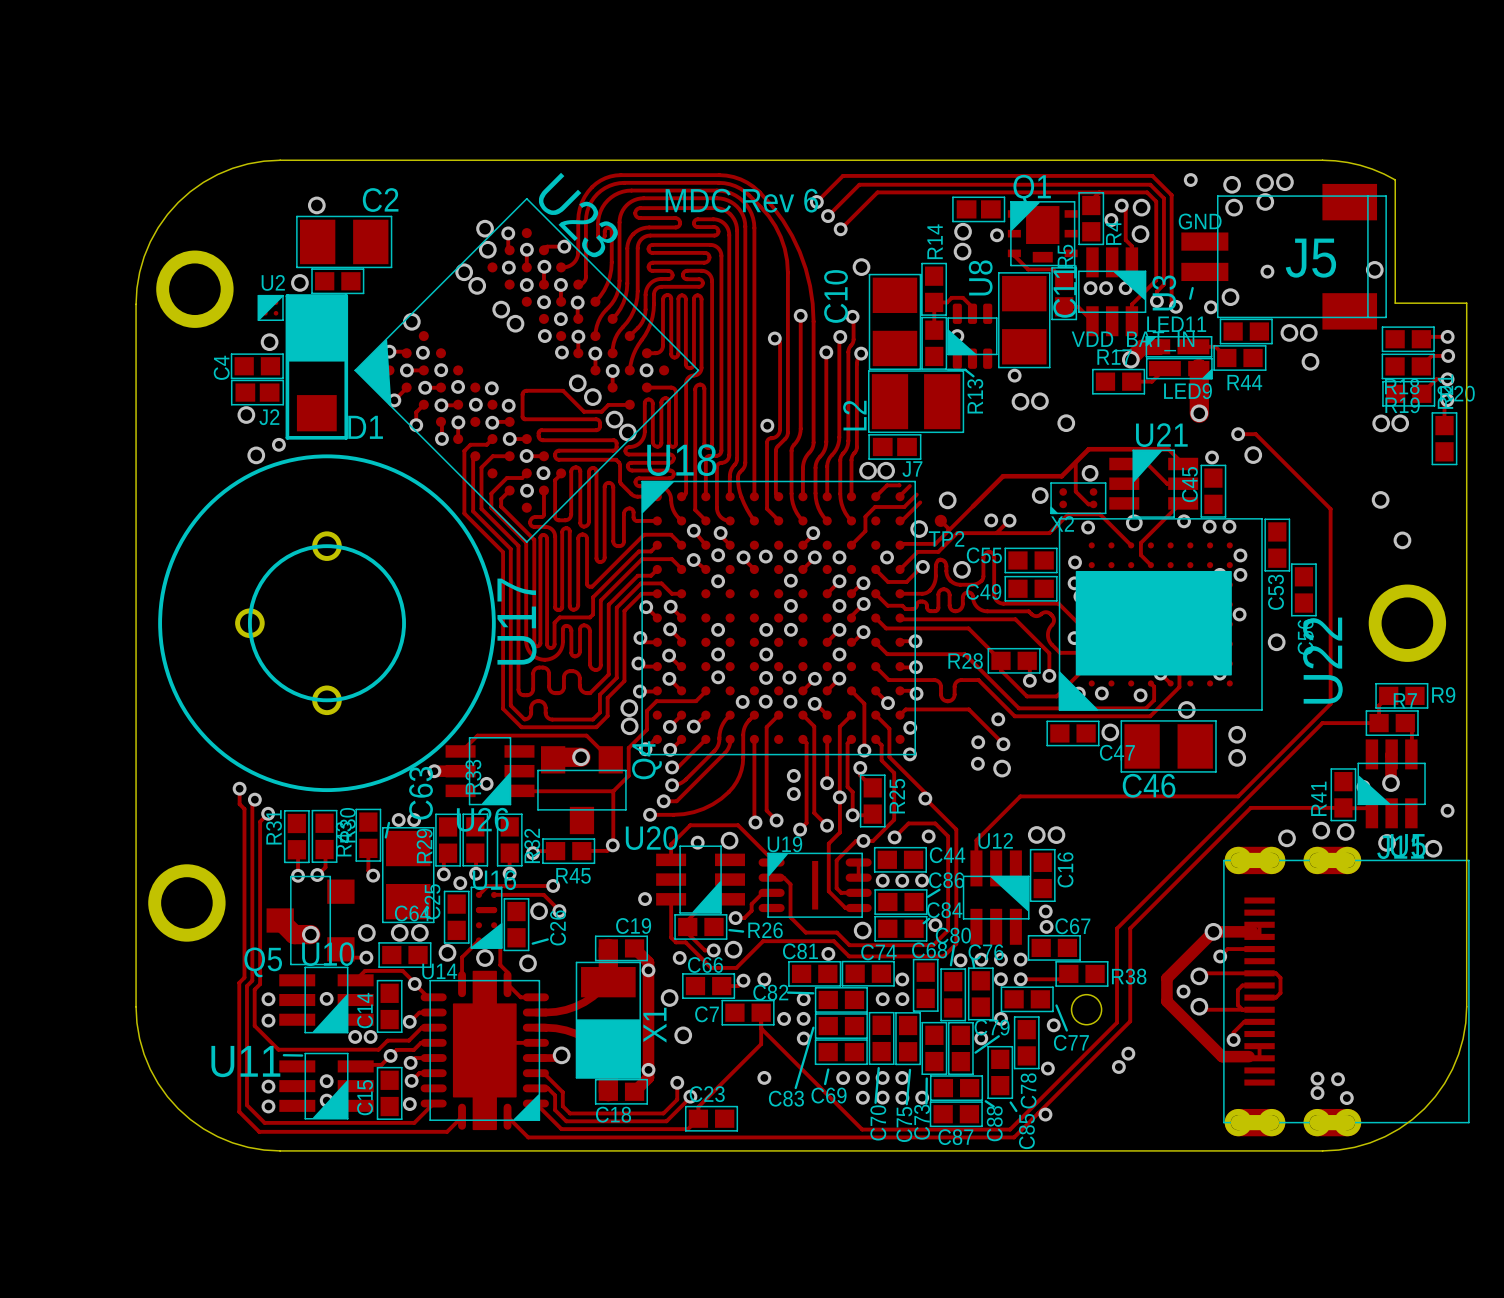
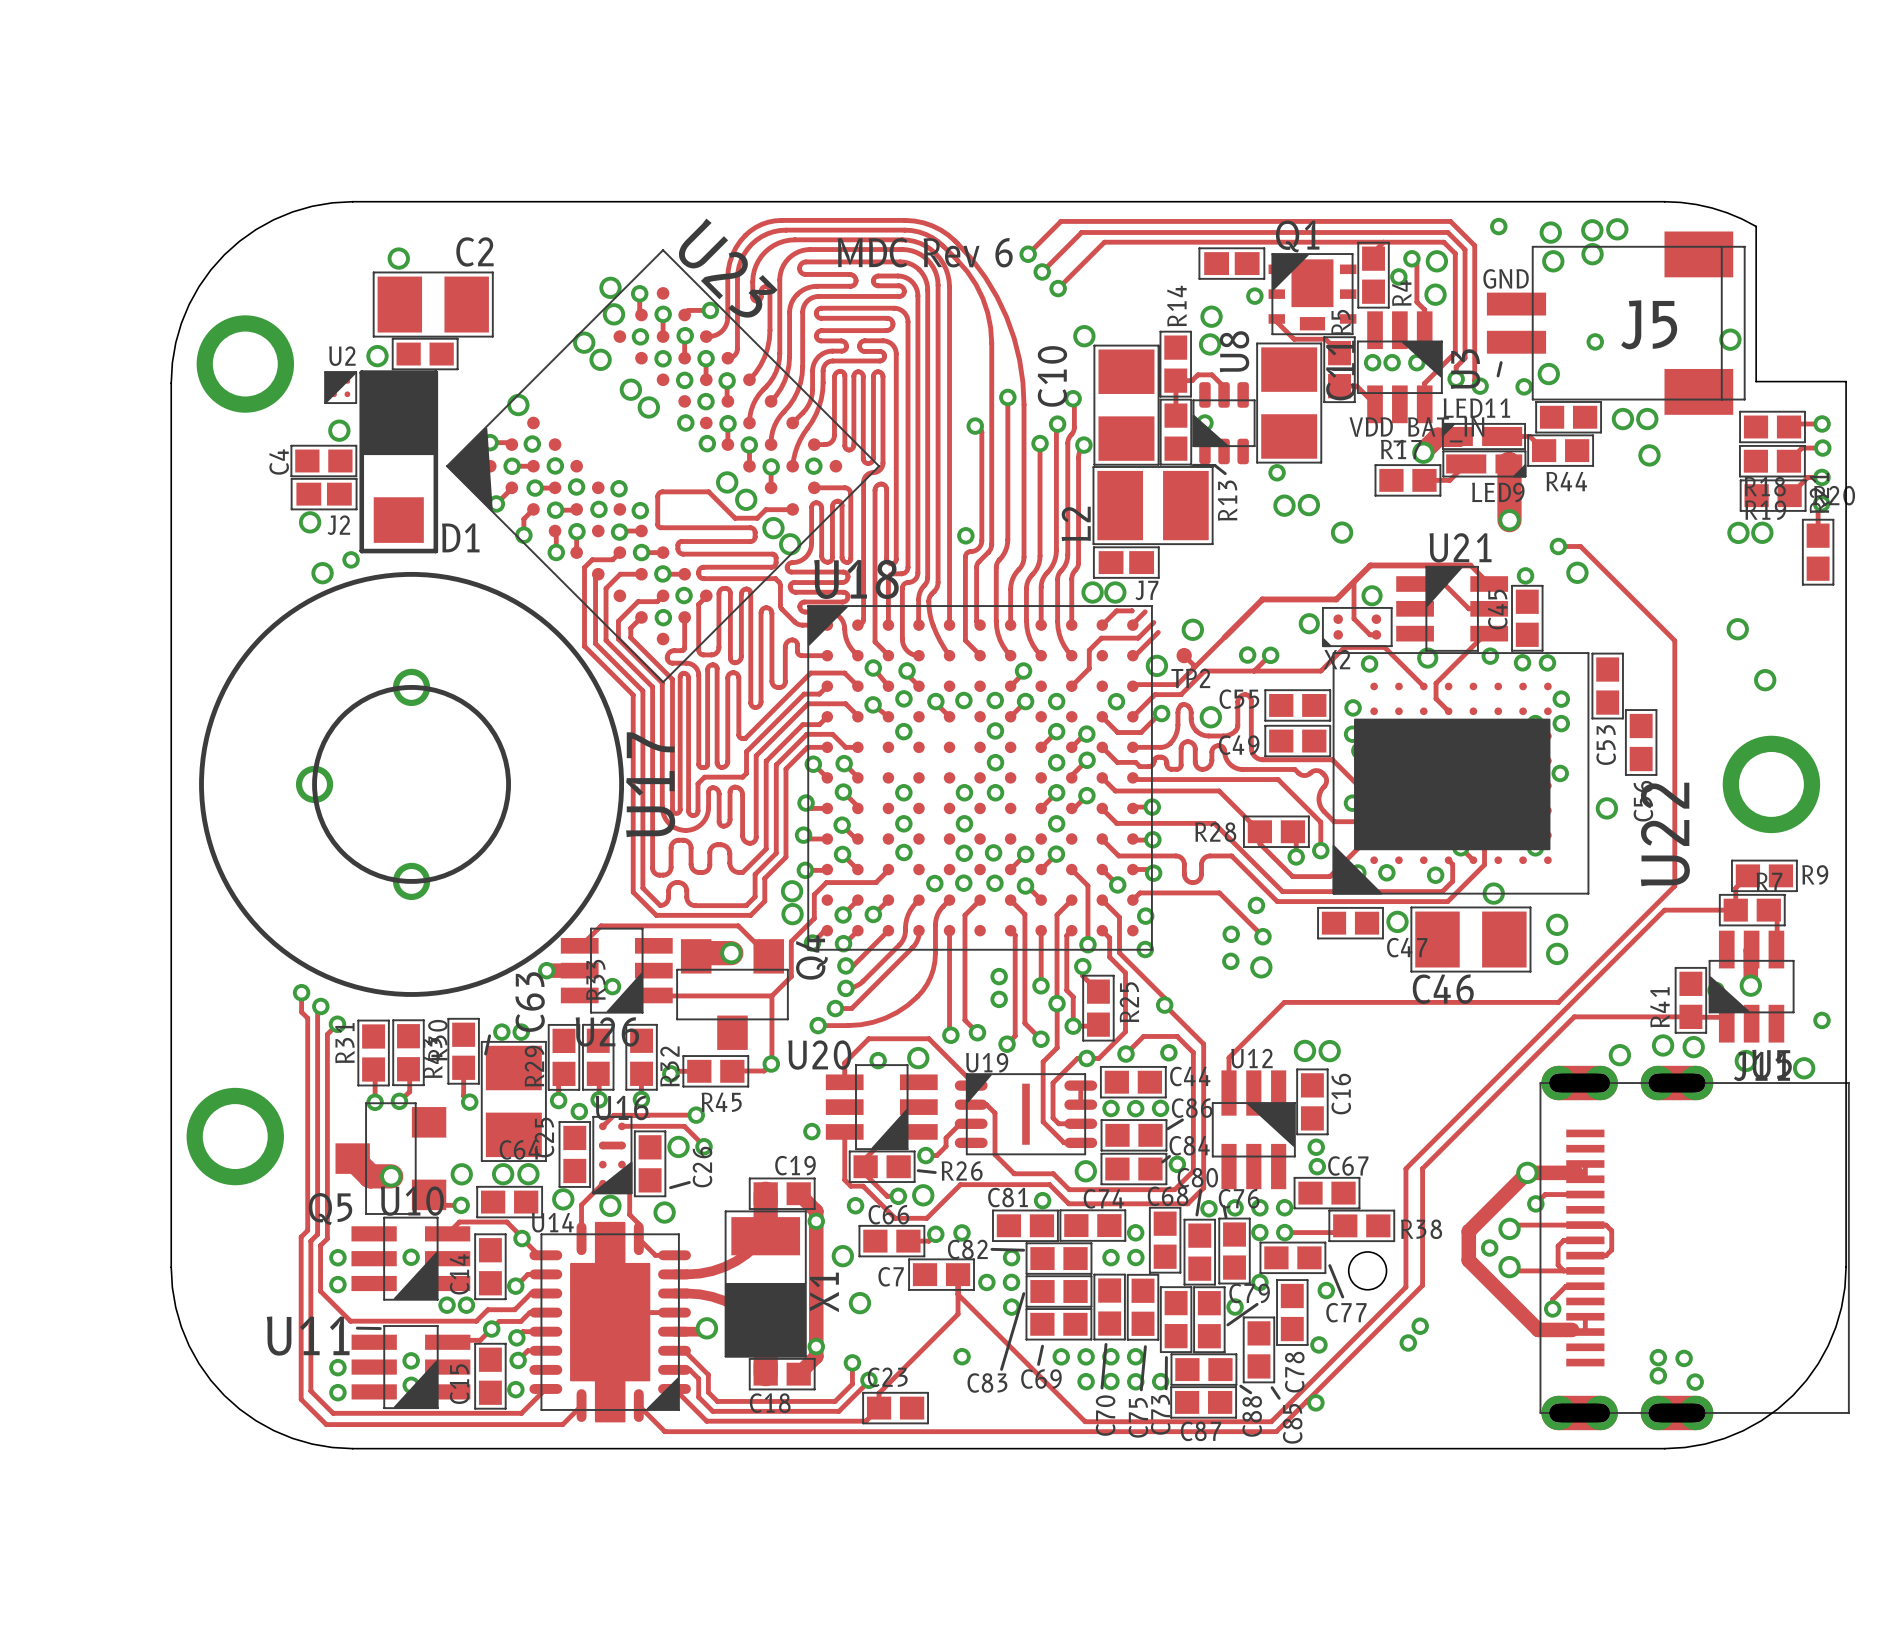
via position: (963, 231) -> (1210, 344)

